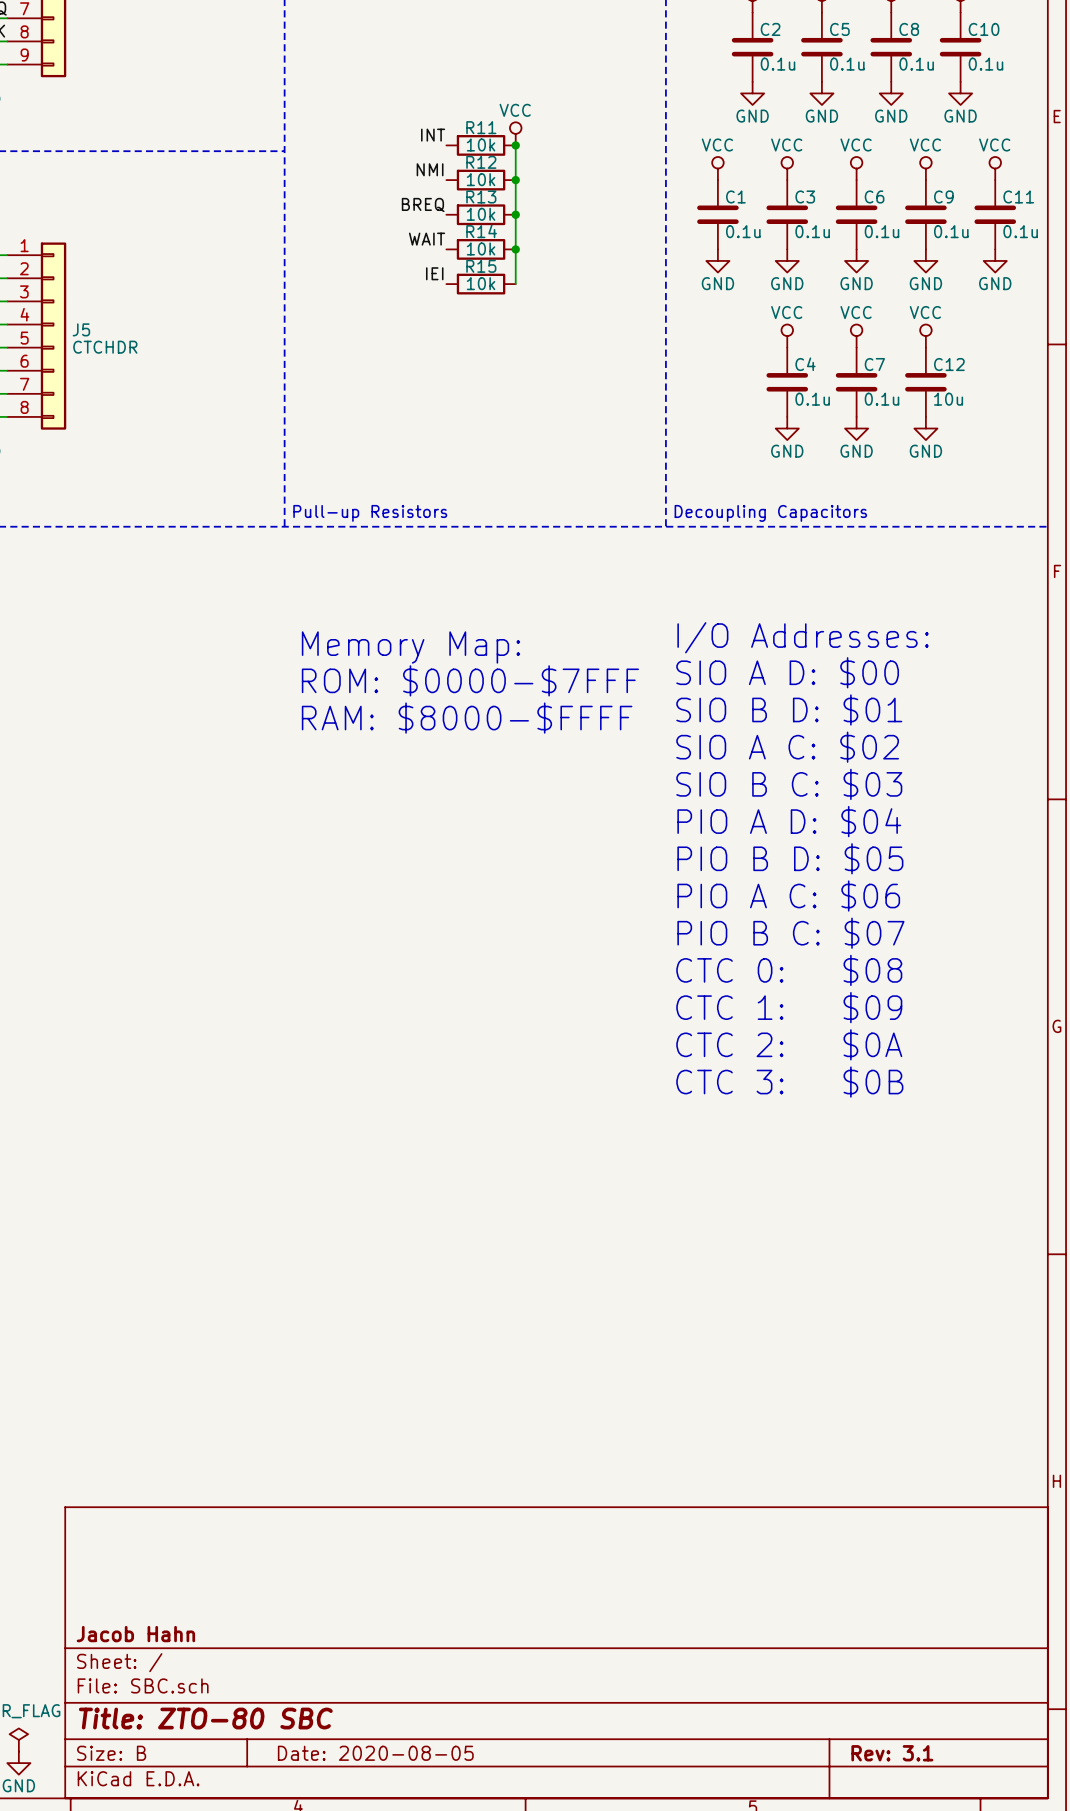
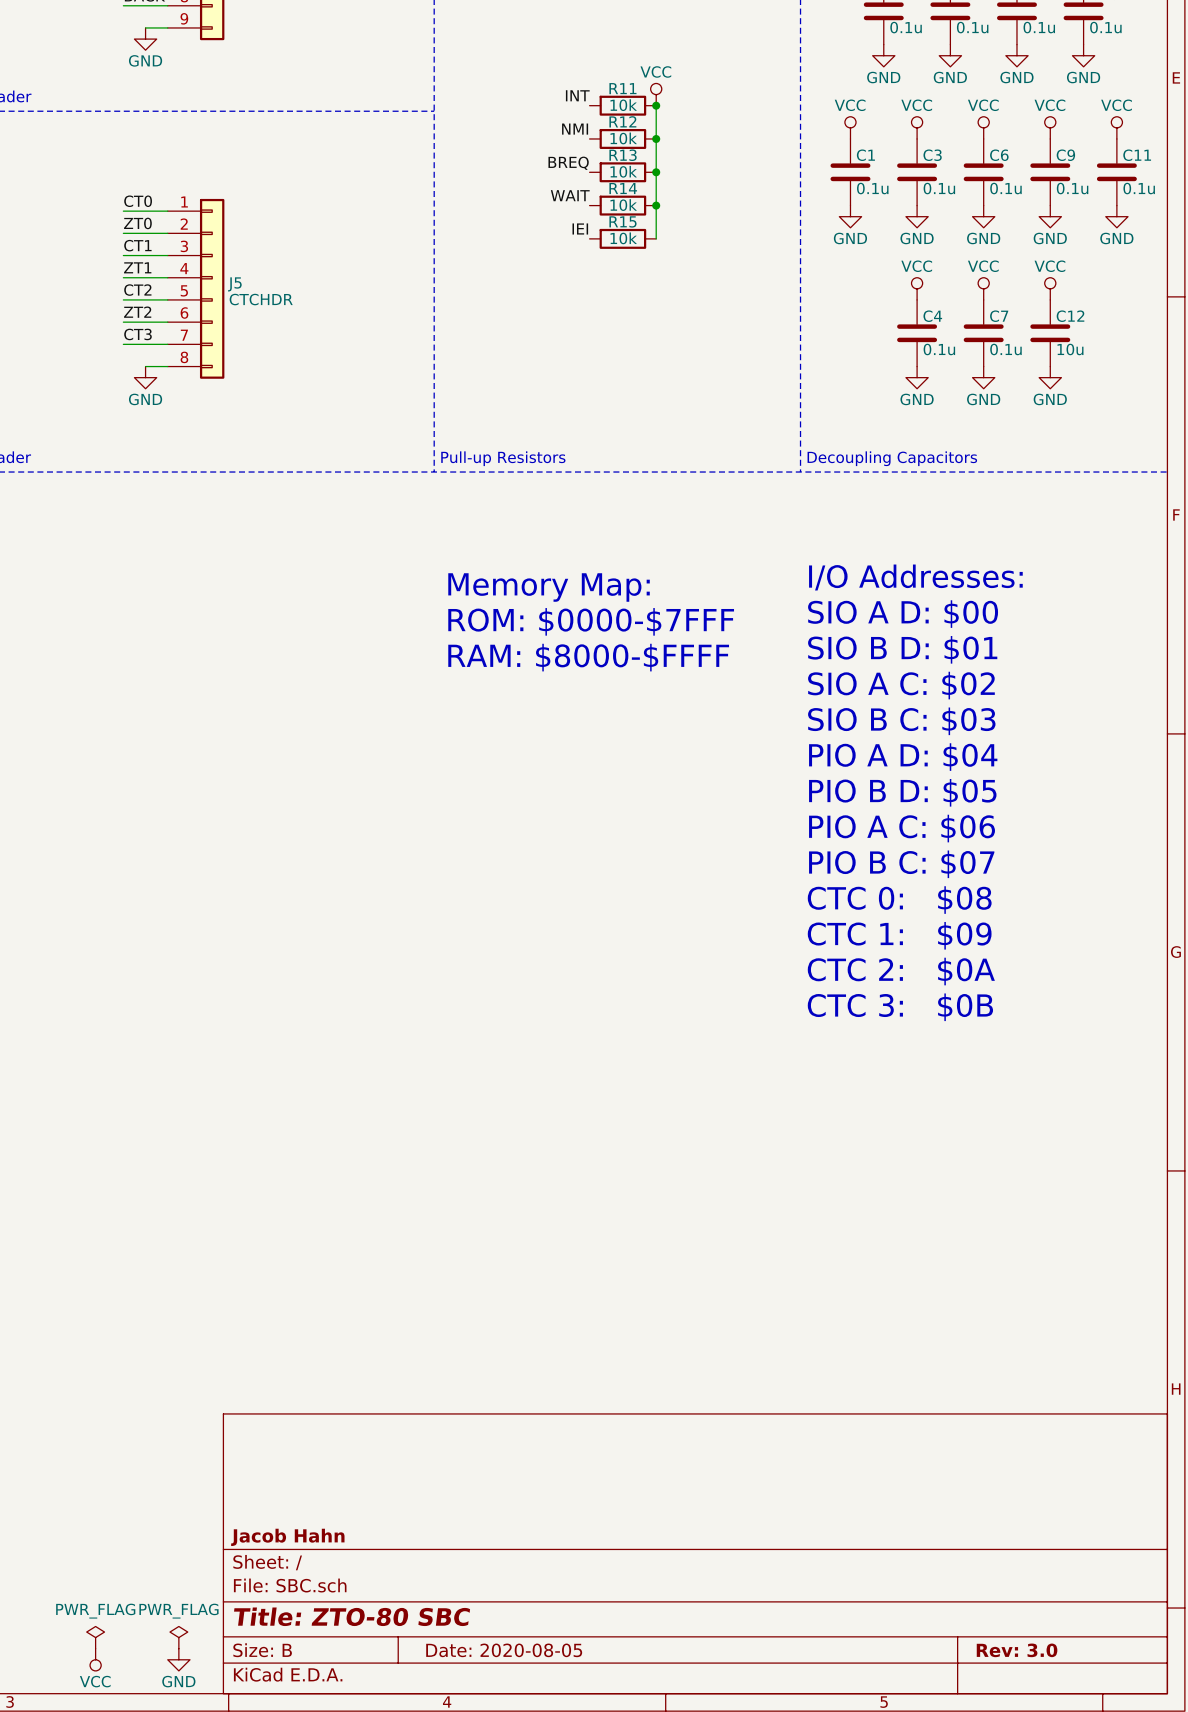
title block: Rev: 3.1 (892, 1753) -> Rev: 3.0 (1017, 1650)

